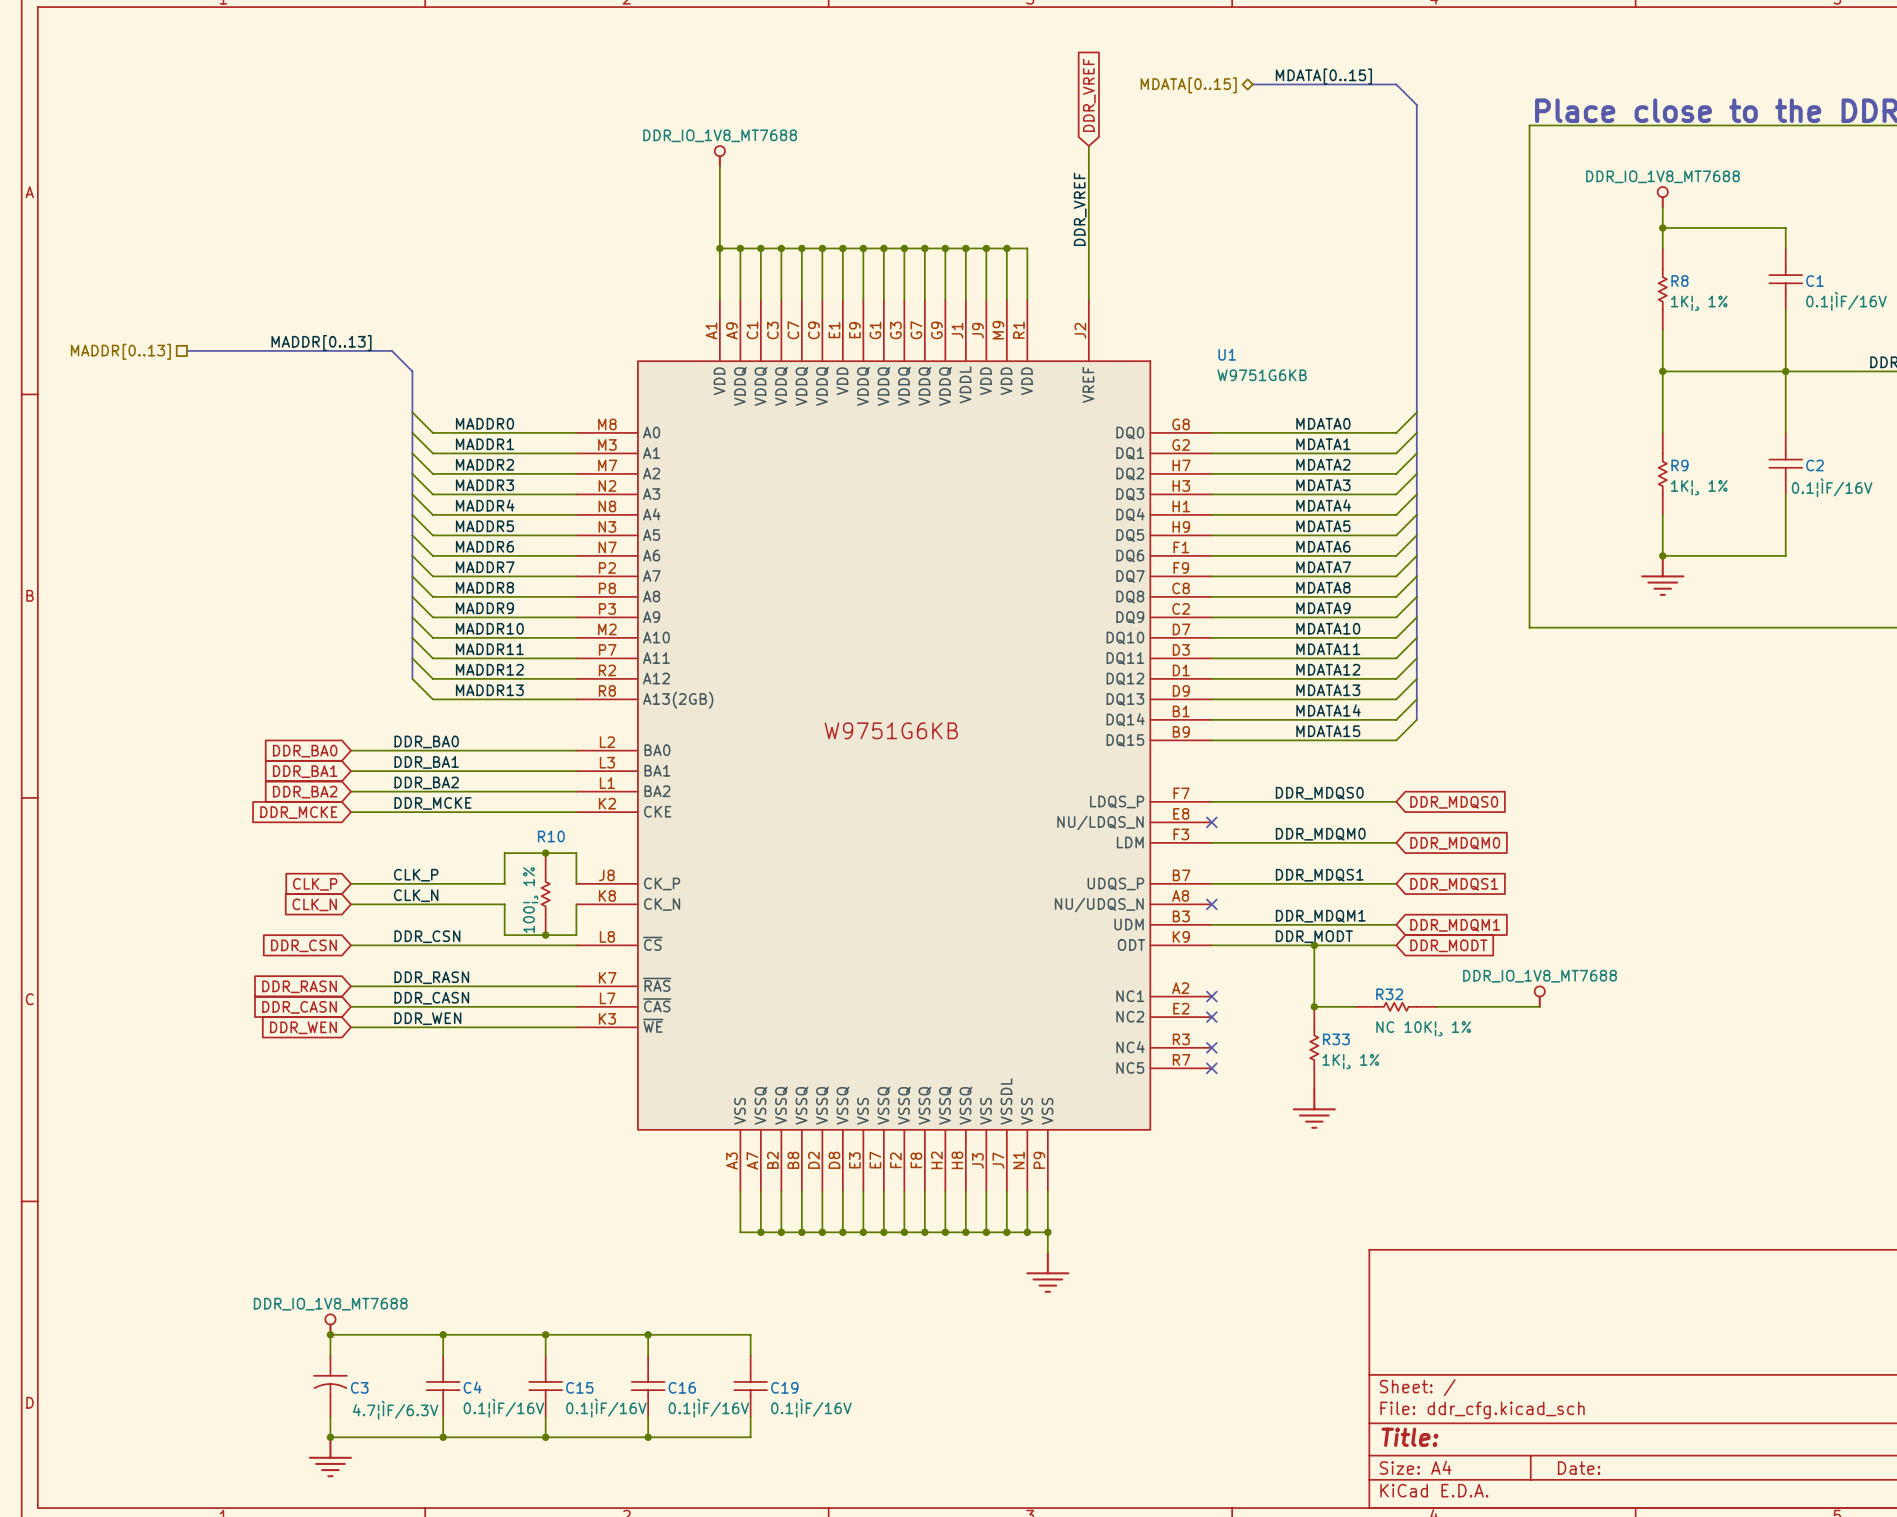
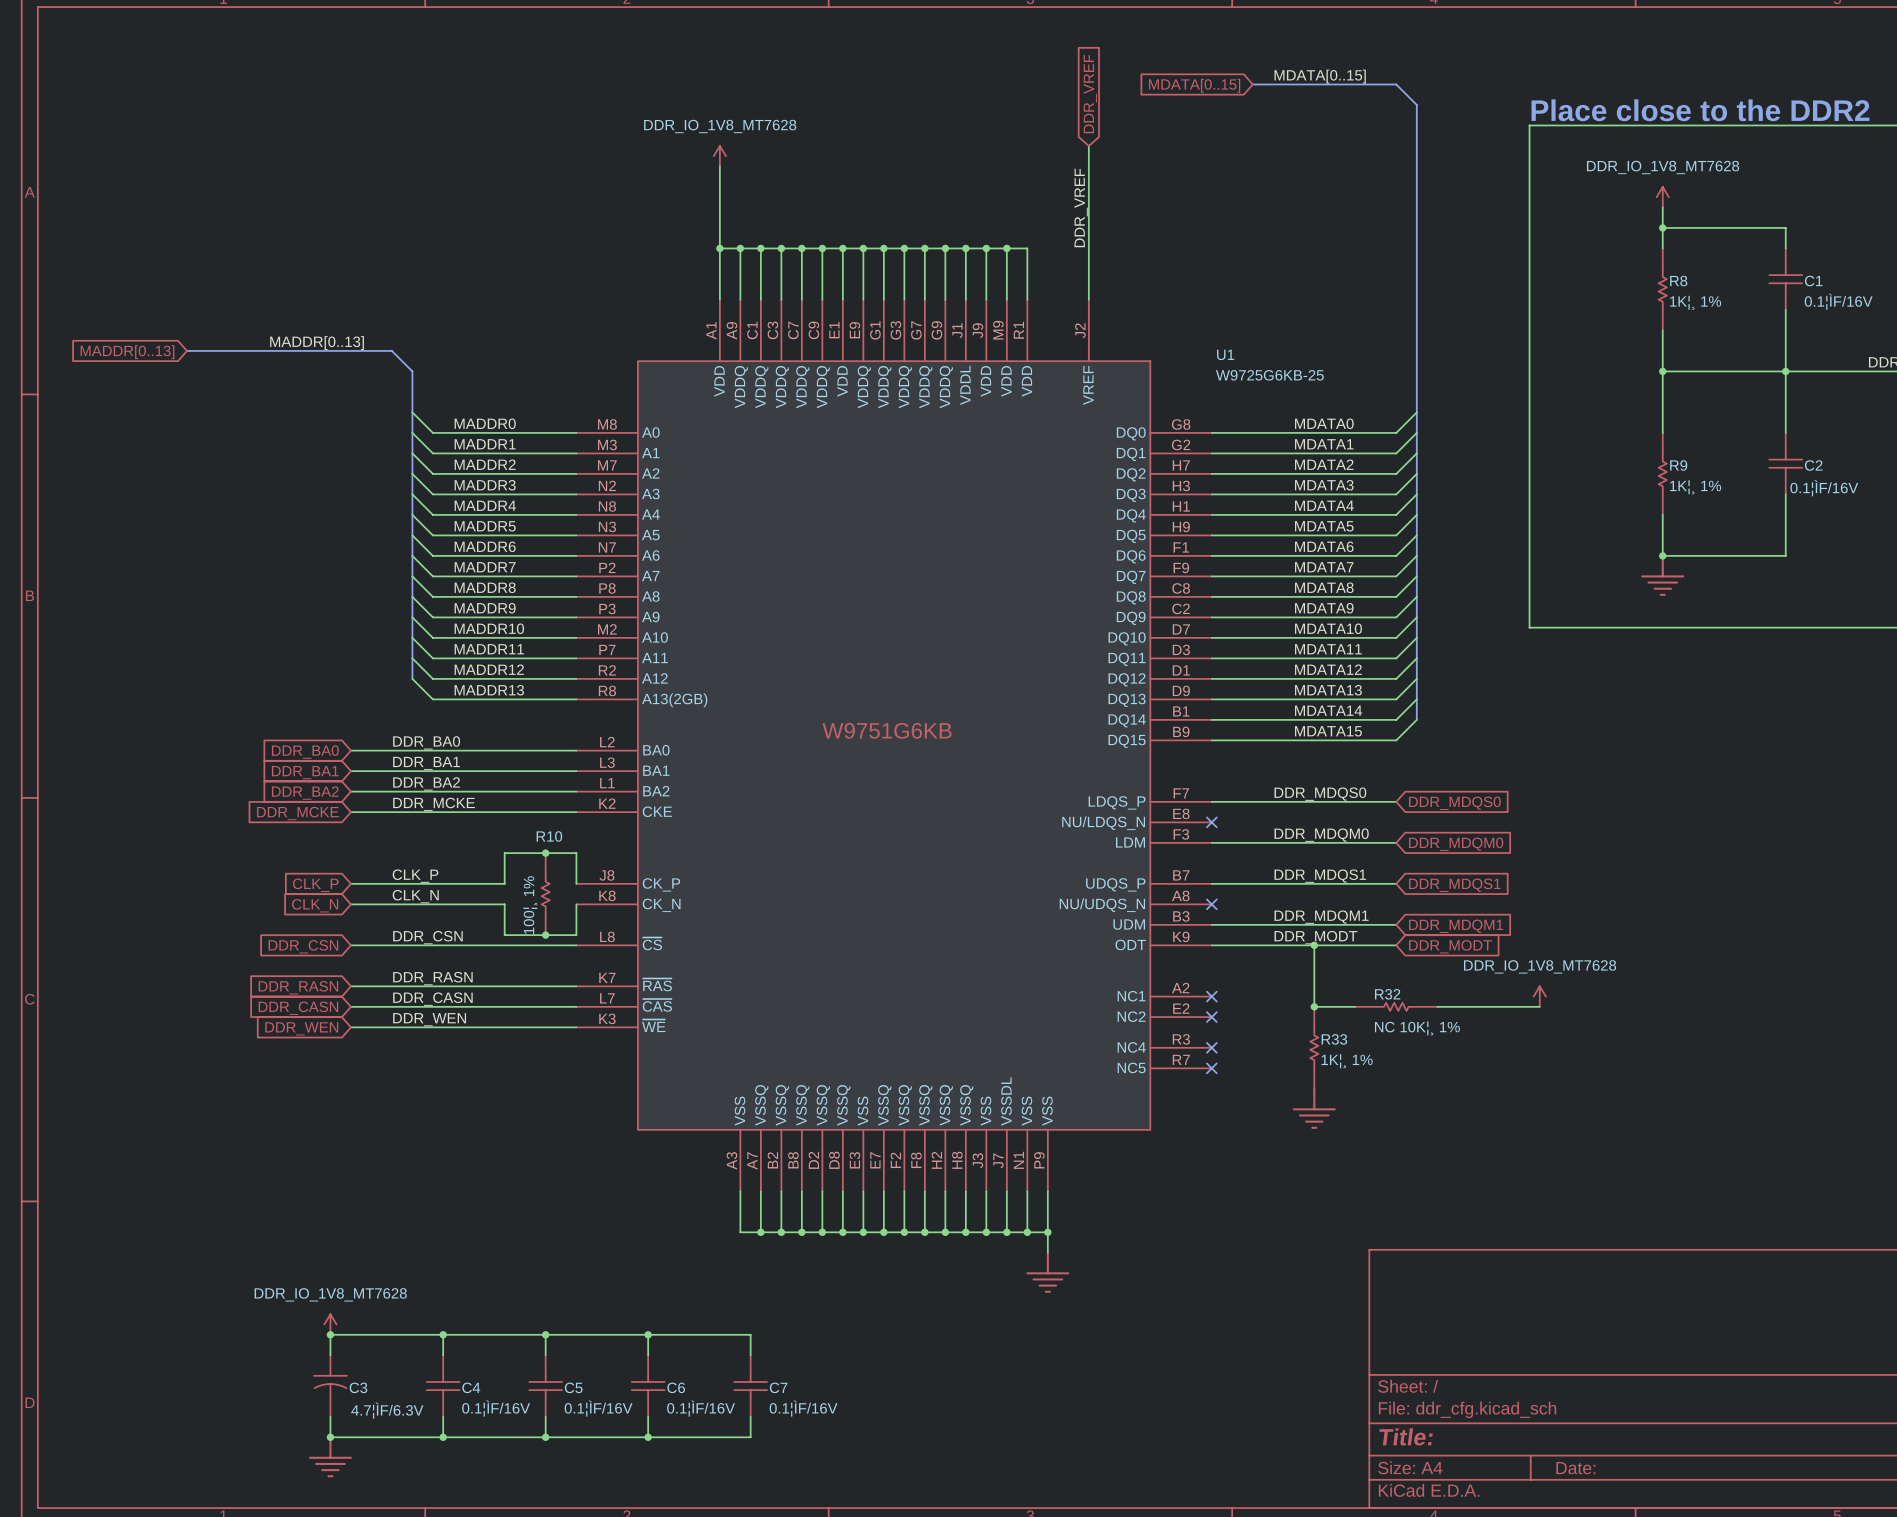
hierarchical label: MDATA[0..15] (1188, 85) -> none
global label: none -> MDATA[0..15] (1194, 85)
power symbol: DDR_IO_1V8_MT7688 (719, 156) -> DDR_IO_1V8_MT7628 (719, 156)
power symbol: DDR_IO_1V8_MT7688 (1662, 197) -> DDR_IO_1V8_MT7628 (1662, 197)
hierarchical label: MADDR[0..13] (120, 351) -> none
global label: none -> MADDR[0..13] (127, 352)
U1 value: W9751G6KB (1262, 375) -> W9725G6KB-25 (1269, 375)
power symbol: DDR_IO_1V8_MT7688 (1539, 996) -> DDR_IO_1V8_MT7628 (1539, 996)
power symbol: DDR_IO_1V8_MT7688 (330, 1324) -> DDR_IO_1V8_MT7628 (330, 1324)
C15 name: C15 (579, 1387) -> C5 (573, 1387)
C16 name: C16 (682, 1387) -> C6 (676, 1387)
C19 name: C19 (784, 1387) -> C7 (778, 1387)

